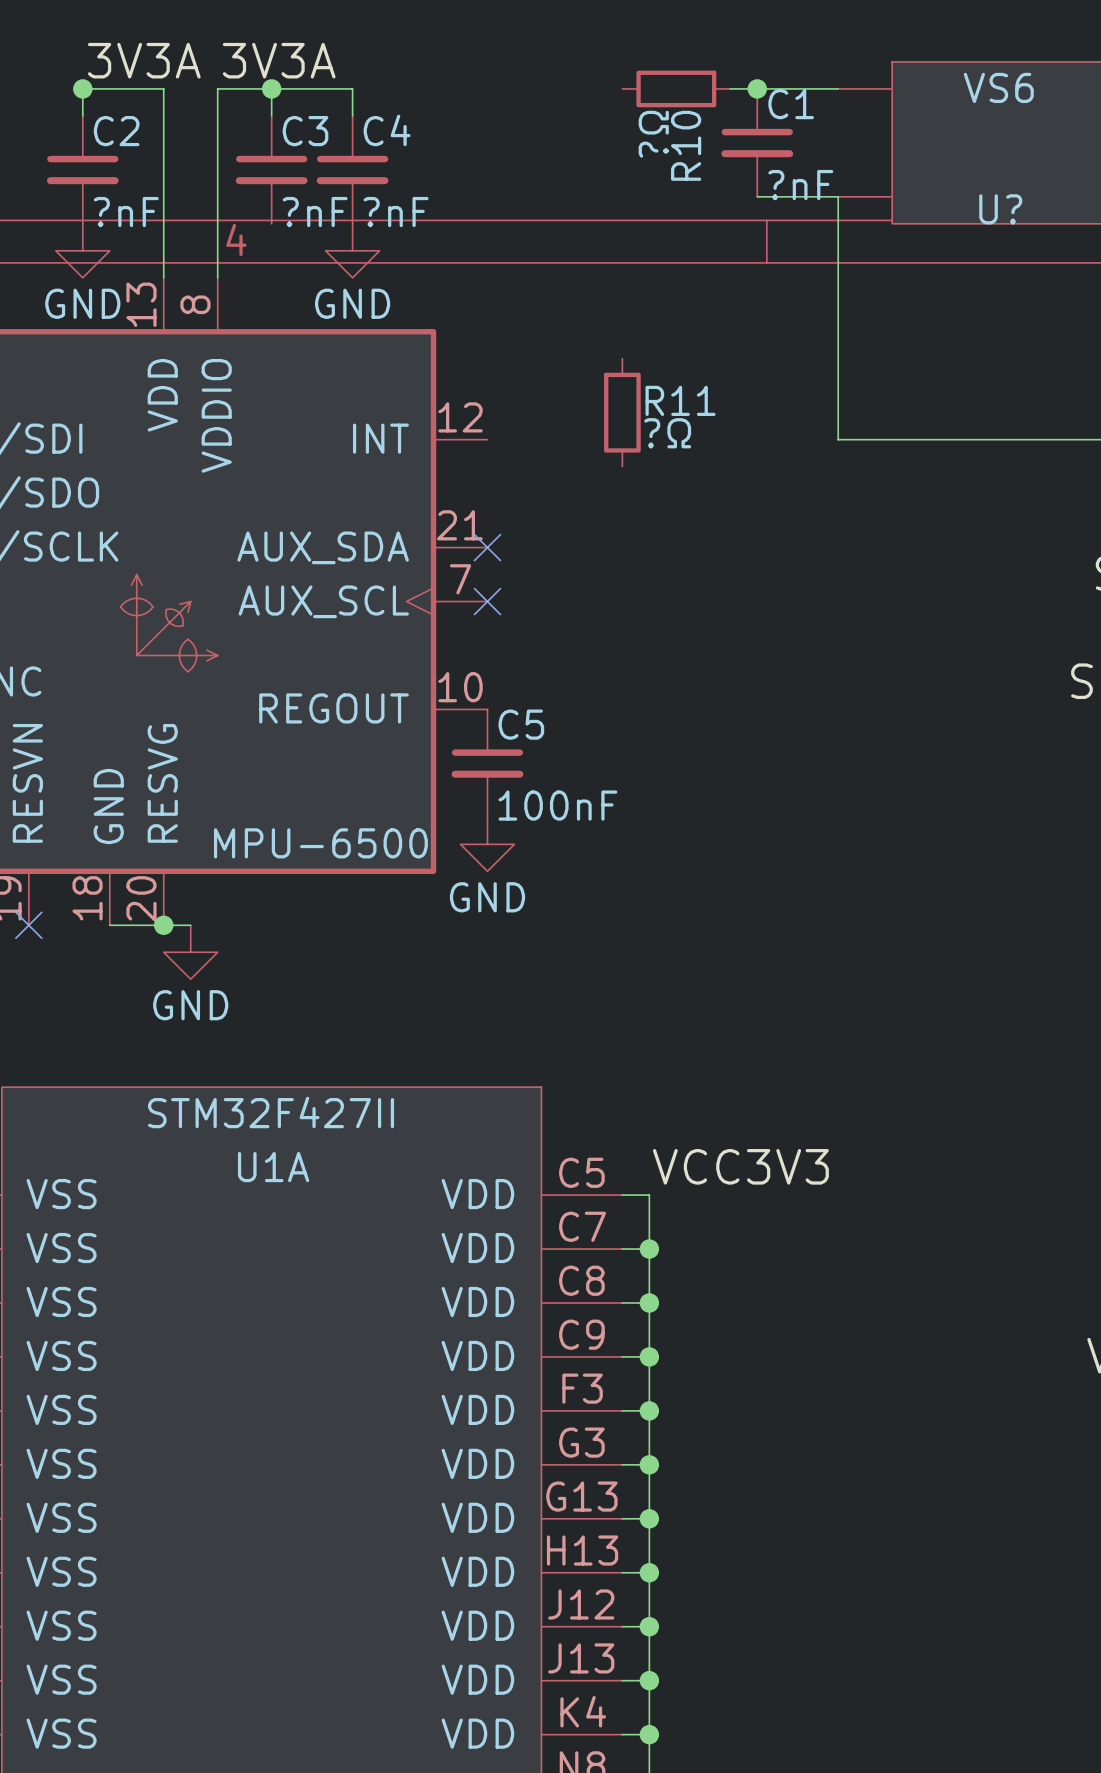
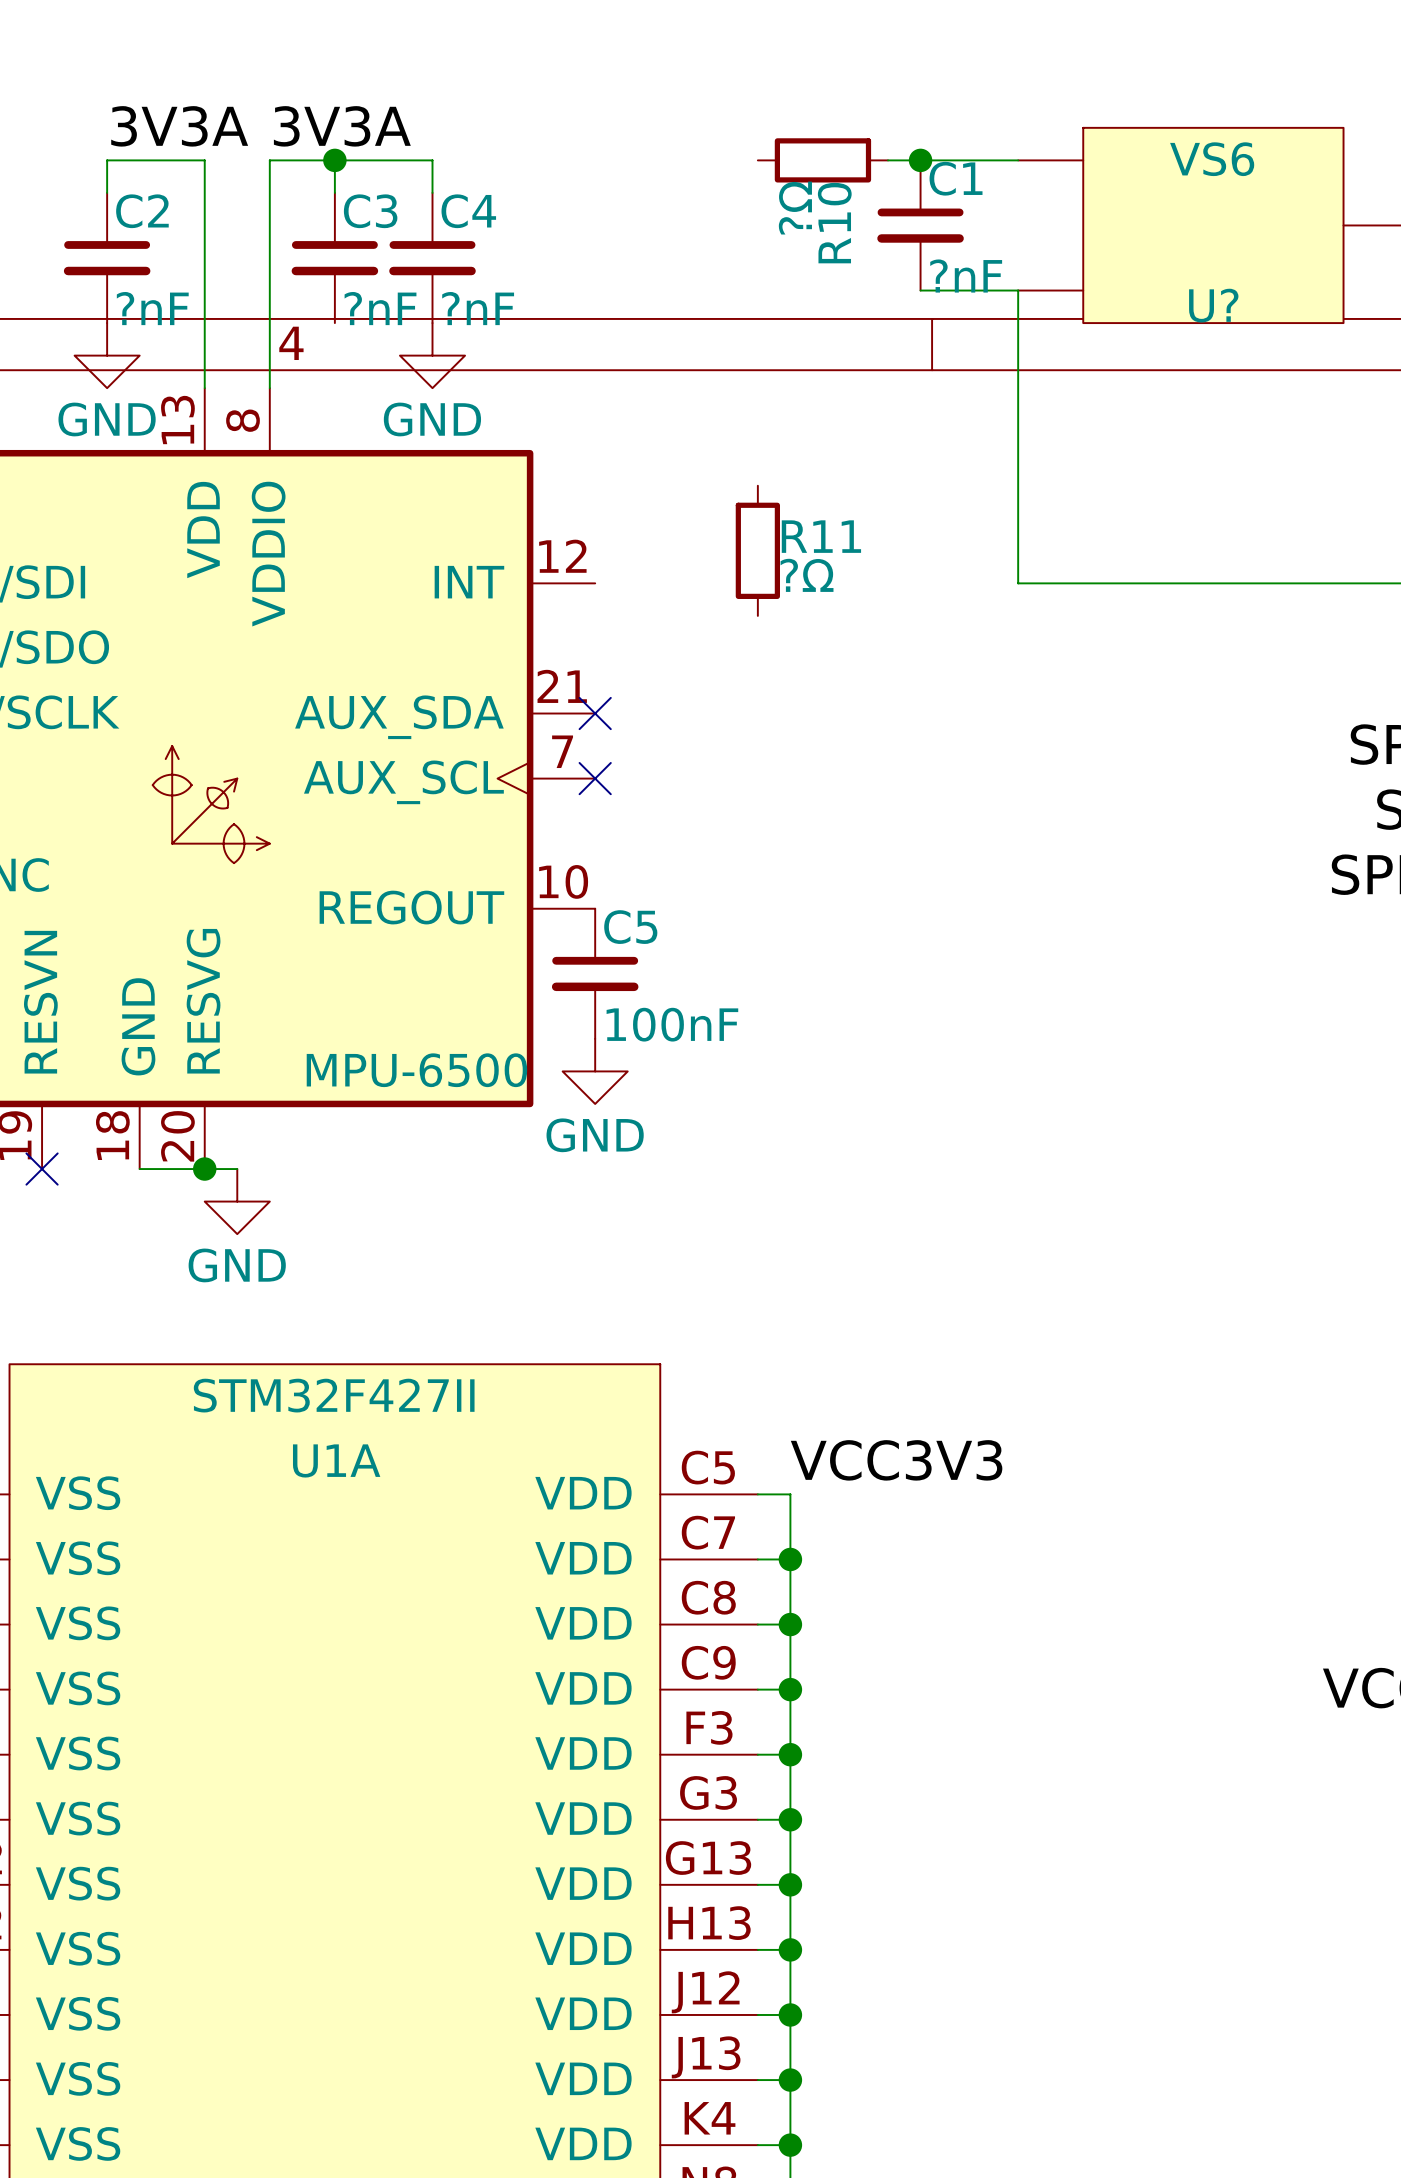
junction: (82, 88) -> none

